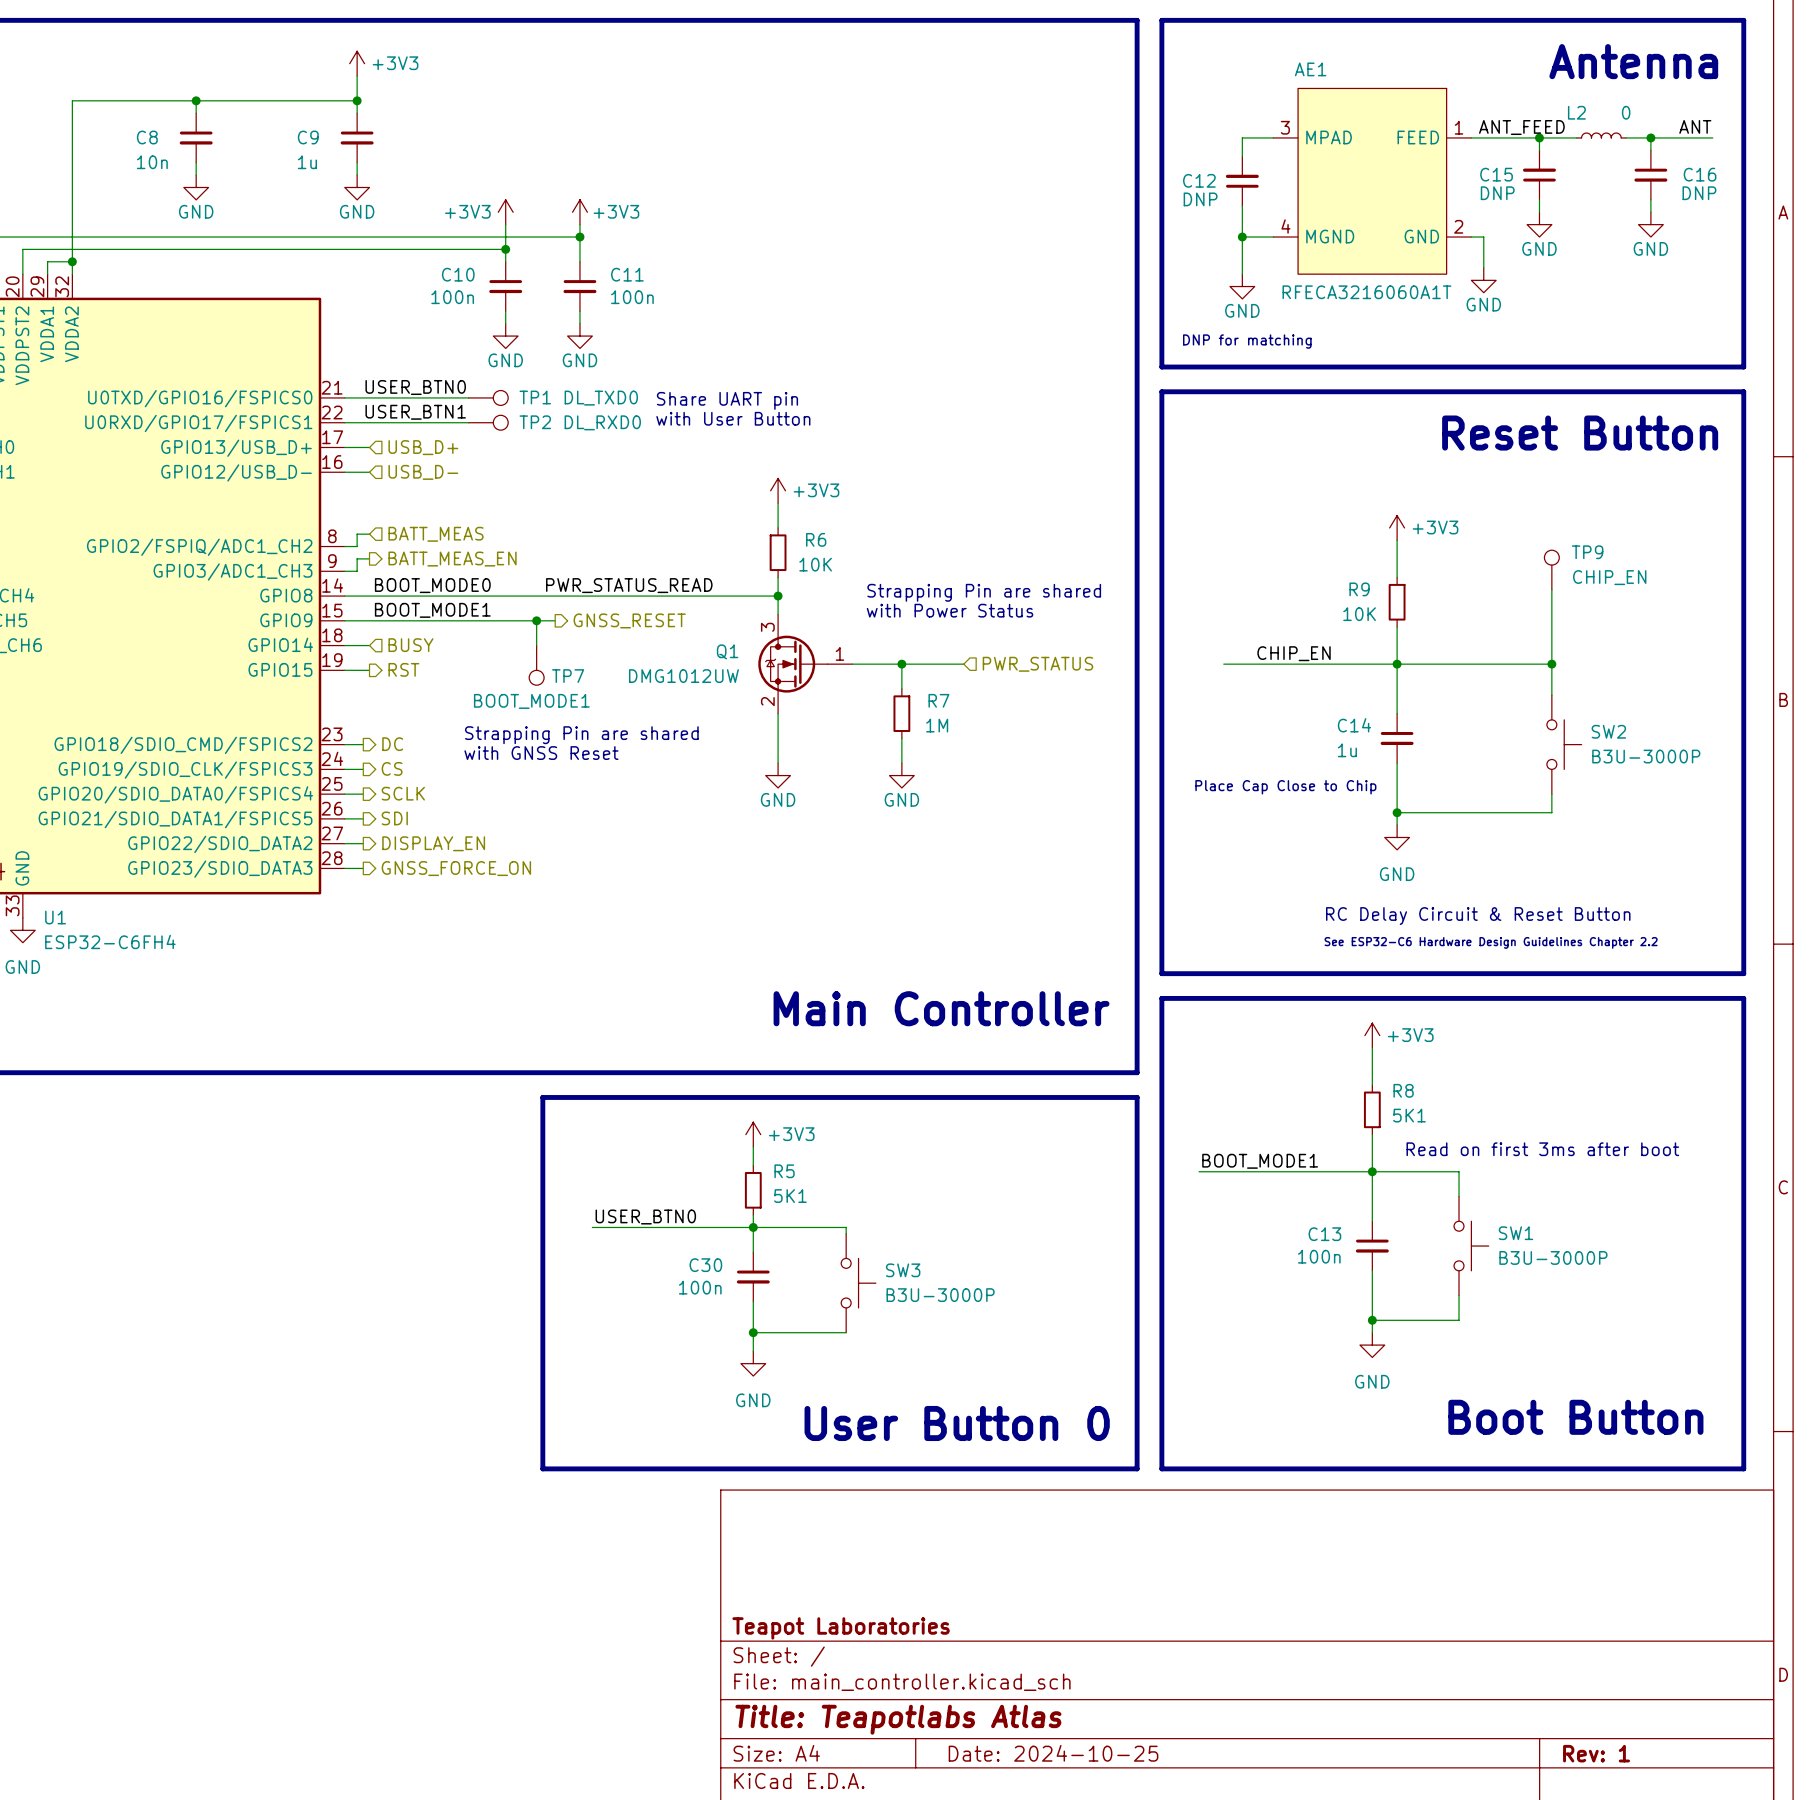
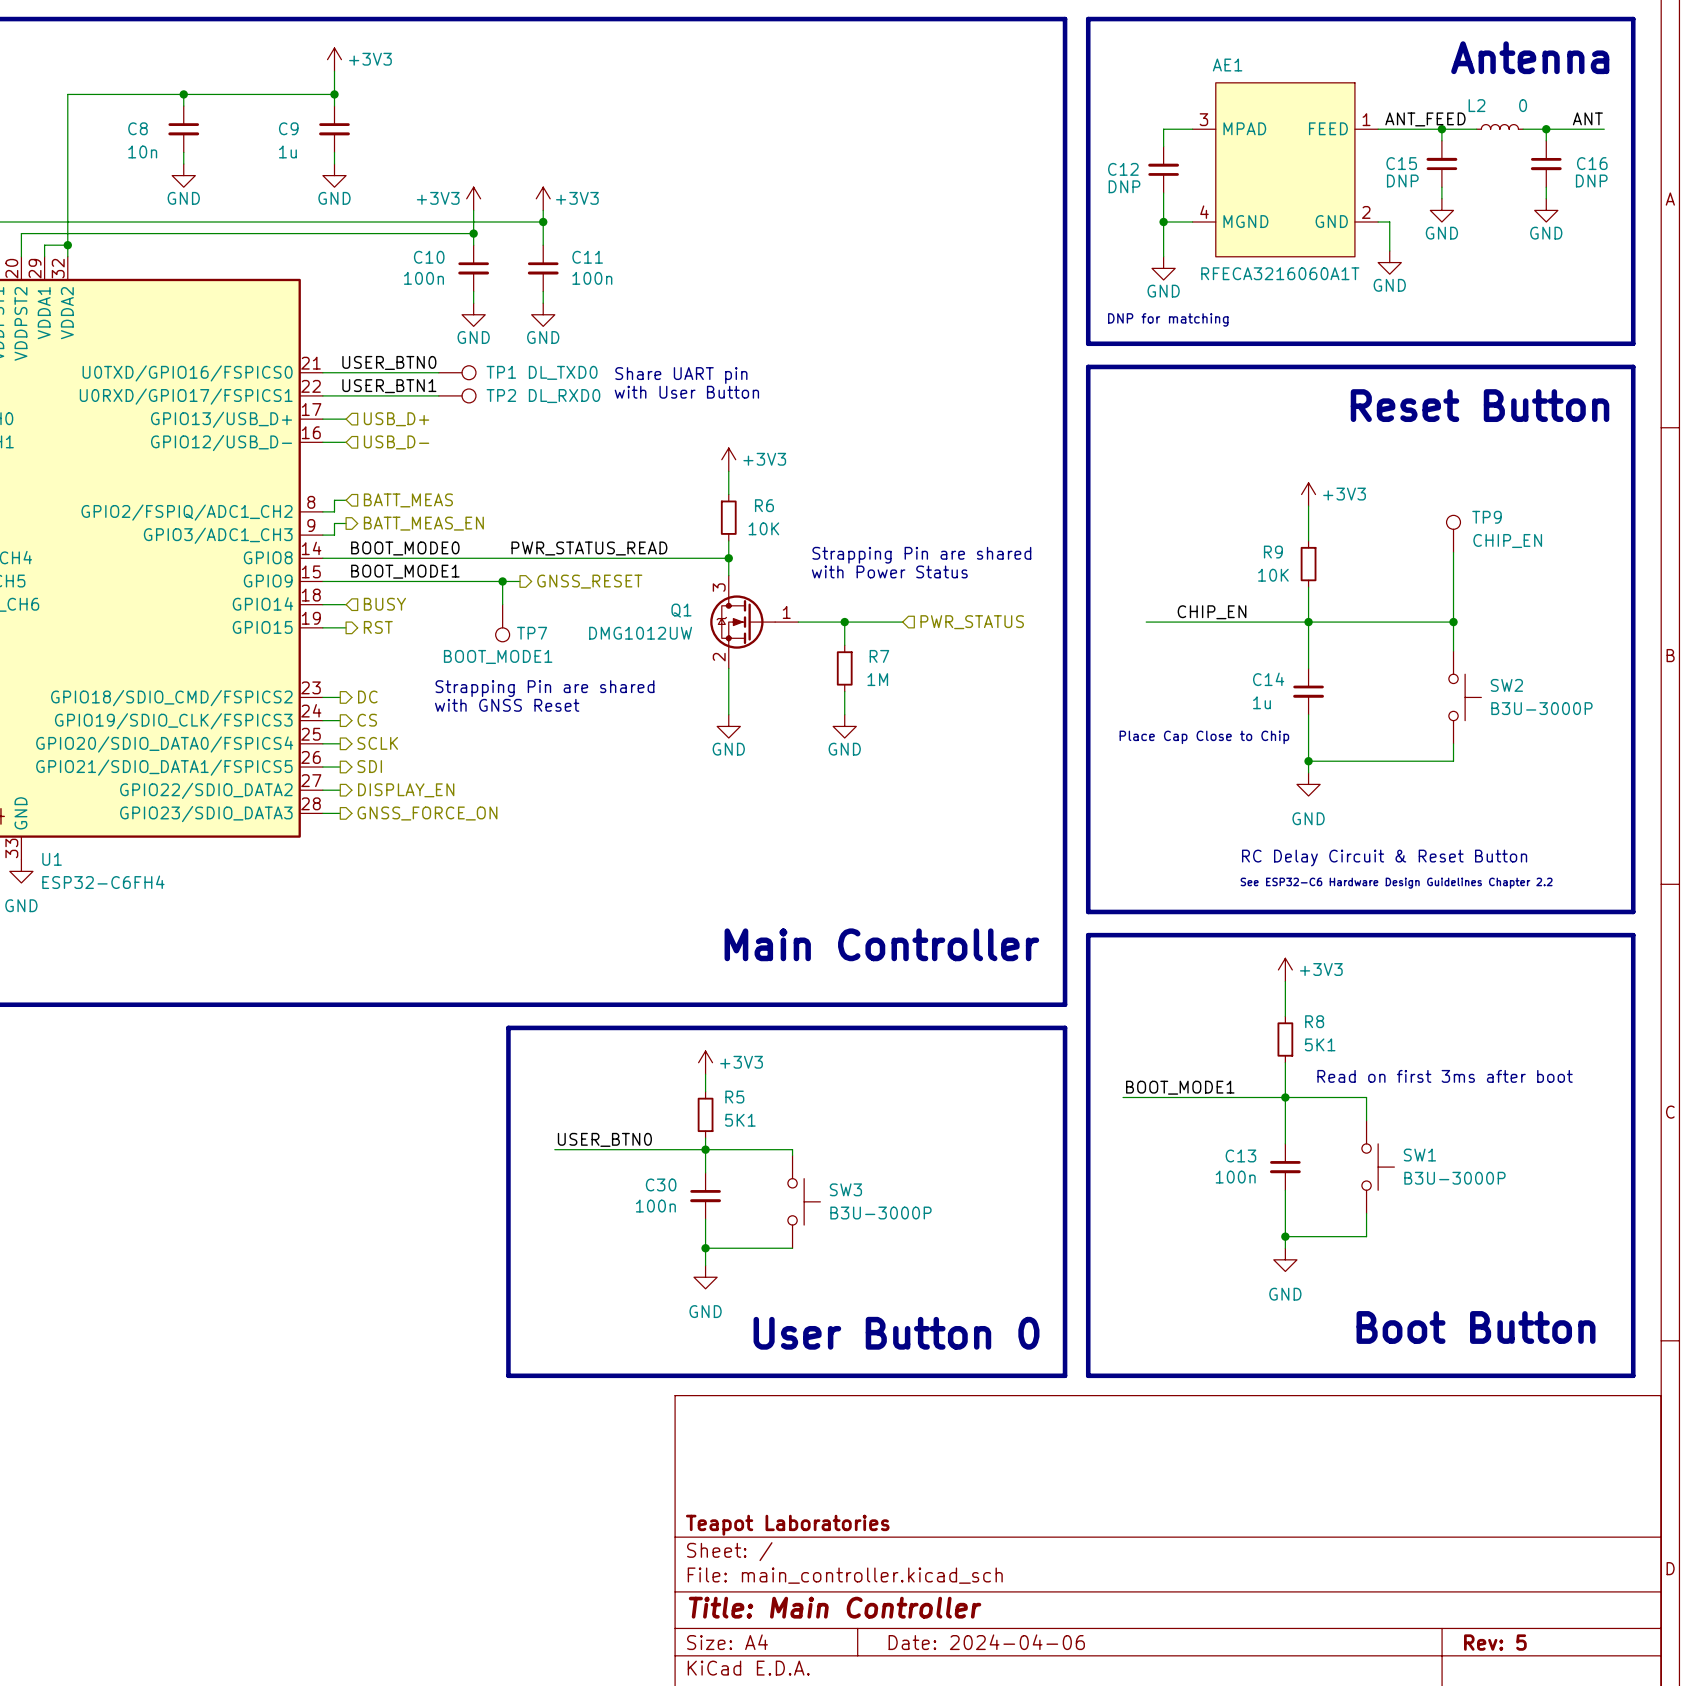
title block: Title: Teapotlabs Atlas (898, 1719) -> Title: Main Controller (835, 1607)
title block: Date: 2024-10-25 (1053, 1753) -> Date: 2024-04-06 (986, 1642)
title block: Rev: 1 (1596, 1753) -> Rev: 5 (1495, 1642)

